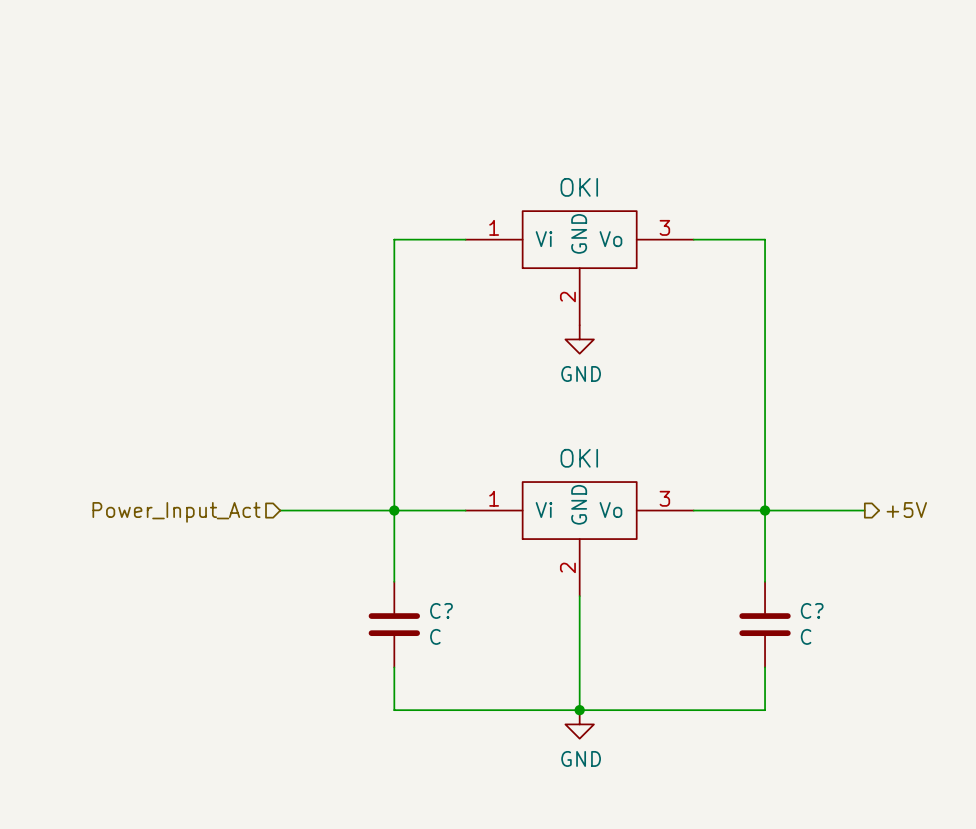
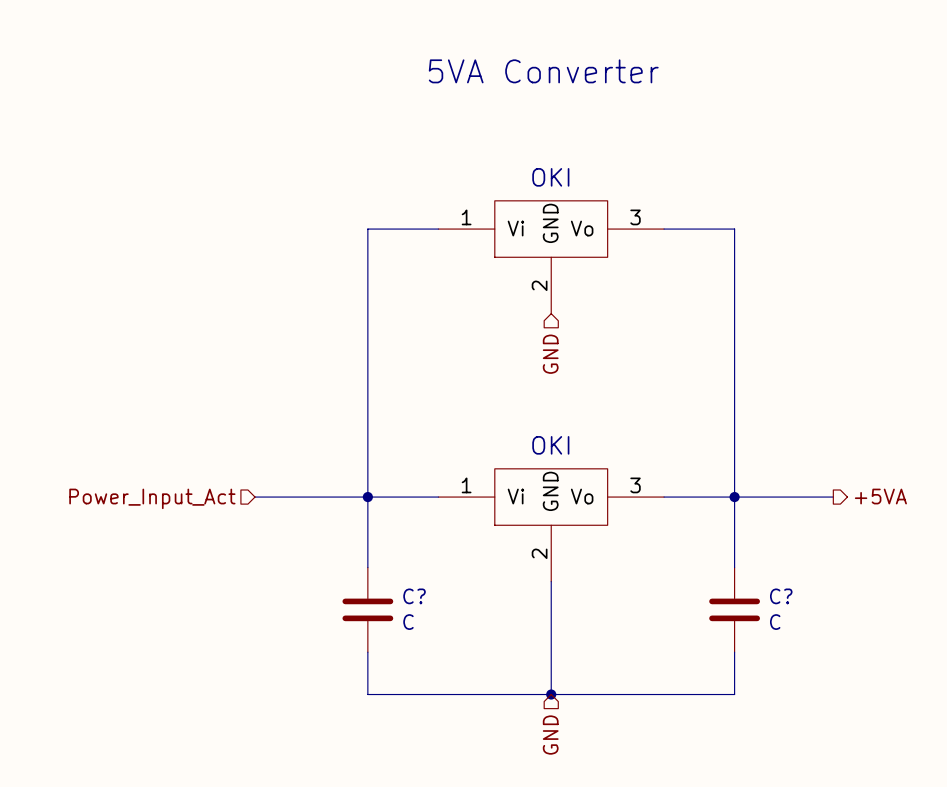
text: none -> 5VA Converter (543, 71)
power symbol: GND (579, 339) -> none
hierarchical label: none -> GND (550, 354)
hierarchical label: +5V (906, 510) -> +5VA (880, 496)
power symbol: GND (579, 724) -> none
hierarchical label: none -> GND (550, 735)

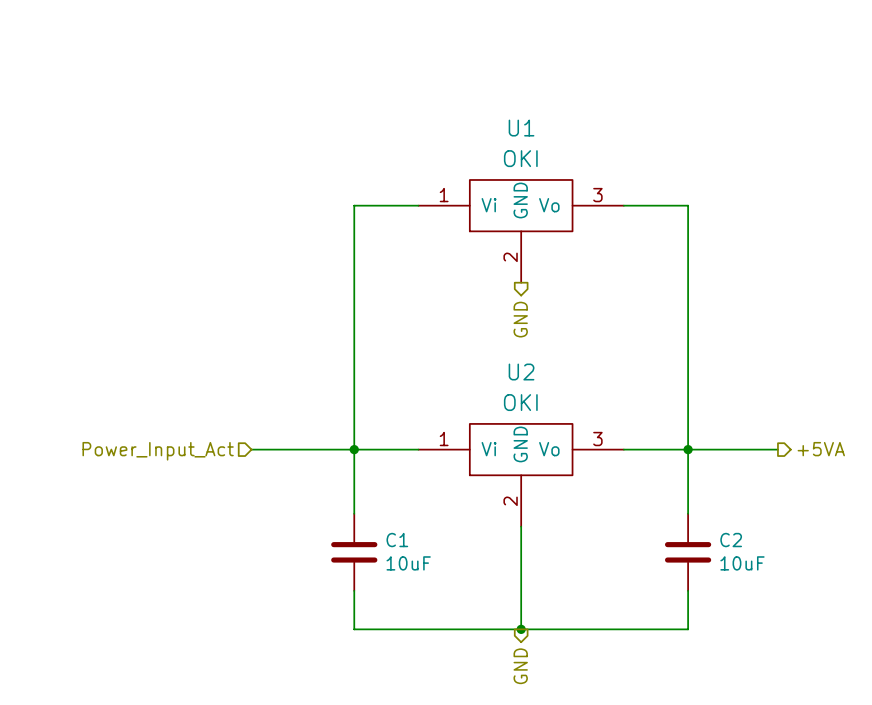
text: 5VA Converter (543, 71) -> none
U1 name: none -> U1 (521, 128)
hierarchical label shape: input (550, 354) -> output (520, 319)
U2 name: none -> U2 (521, 372)
C? name: C? (414, 596) -> C1 (397, 540)
C? name: C? (781, 596) -> C2 (731, 540)
C? value: C (408, 622) -> 10uF (408, 563)
C? value: C (775, 622) -> 10uF (742, 563)
hierarchical label shape: input (550, 735) -> output (520, 666)

